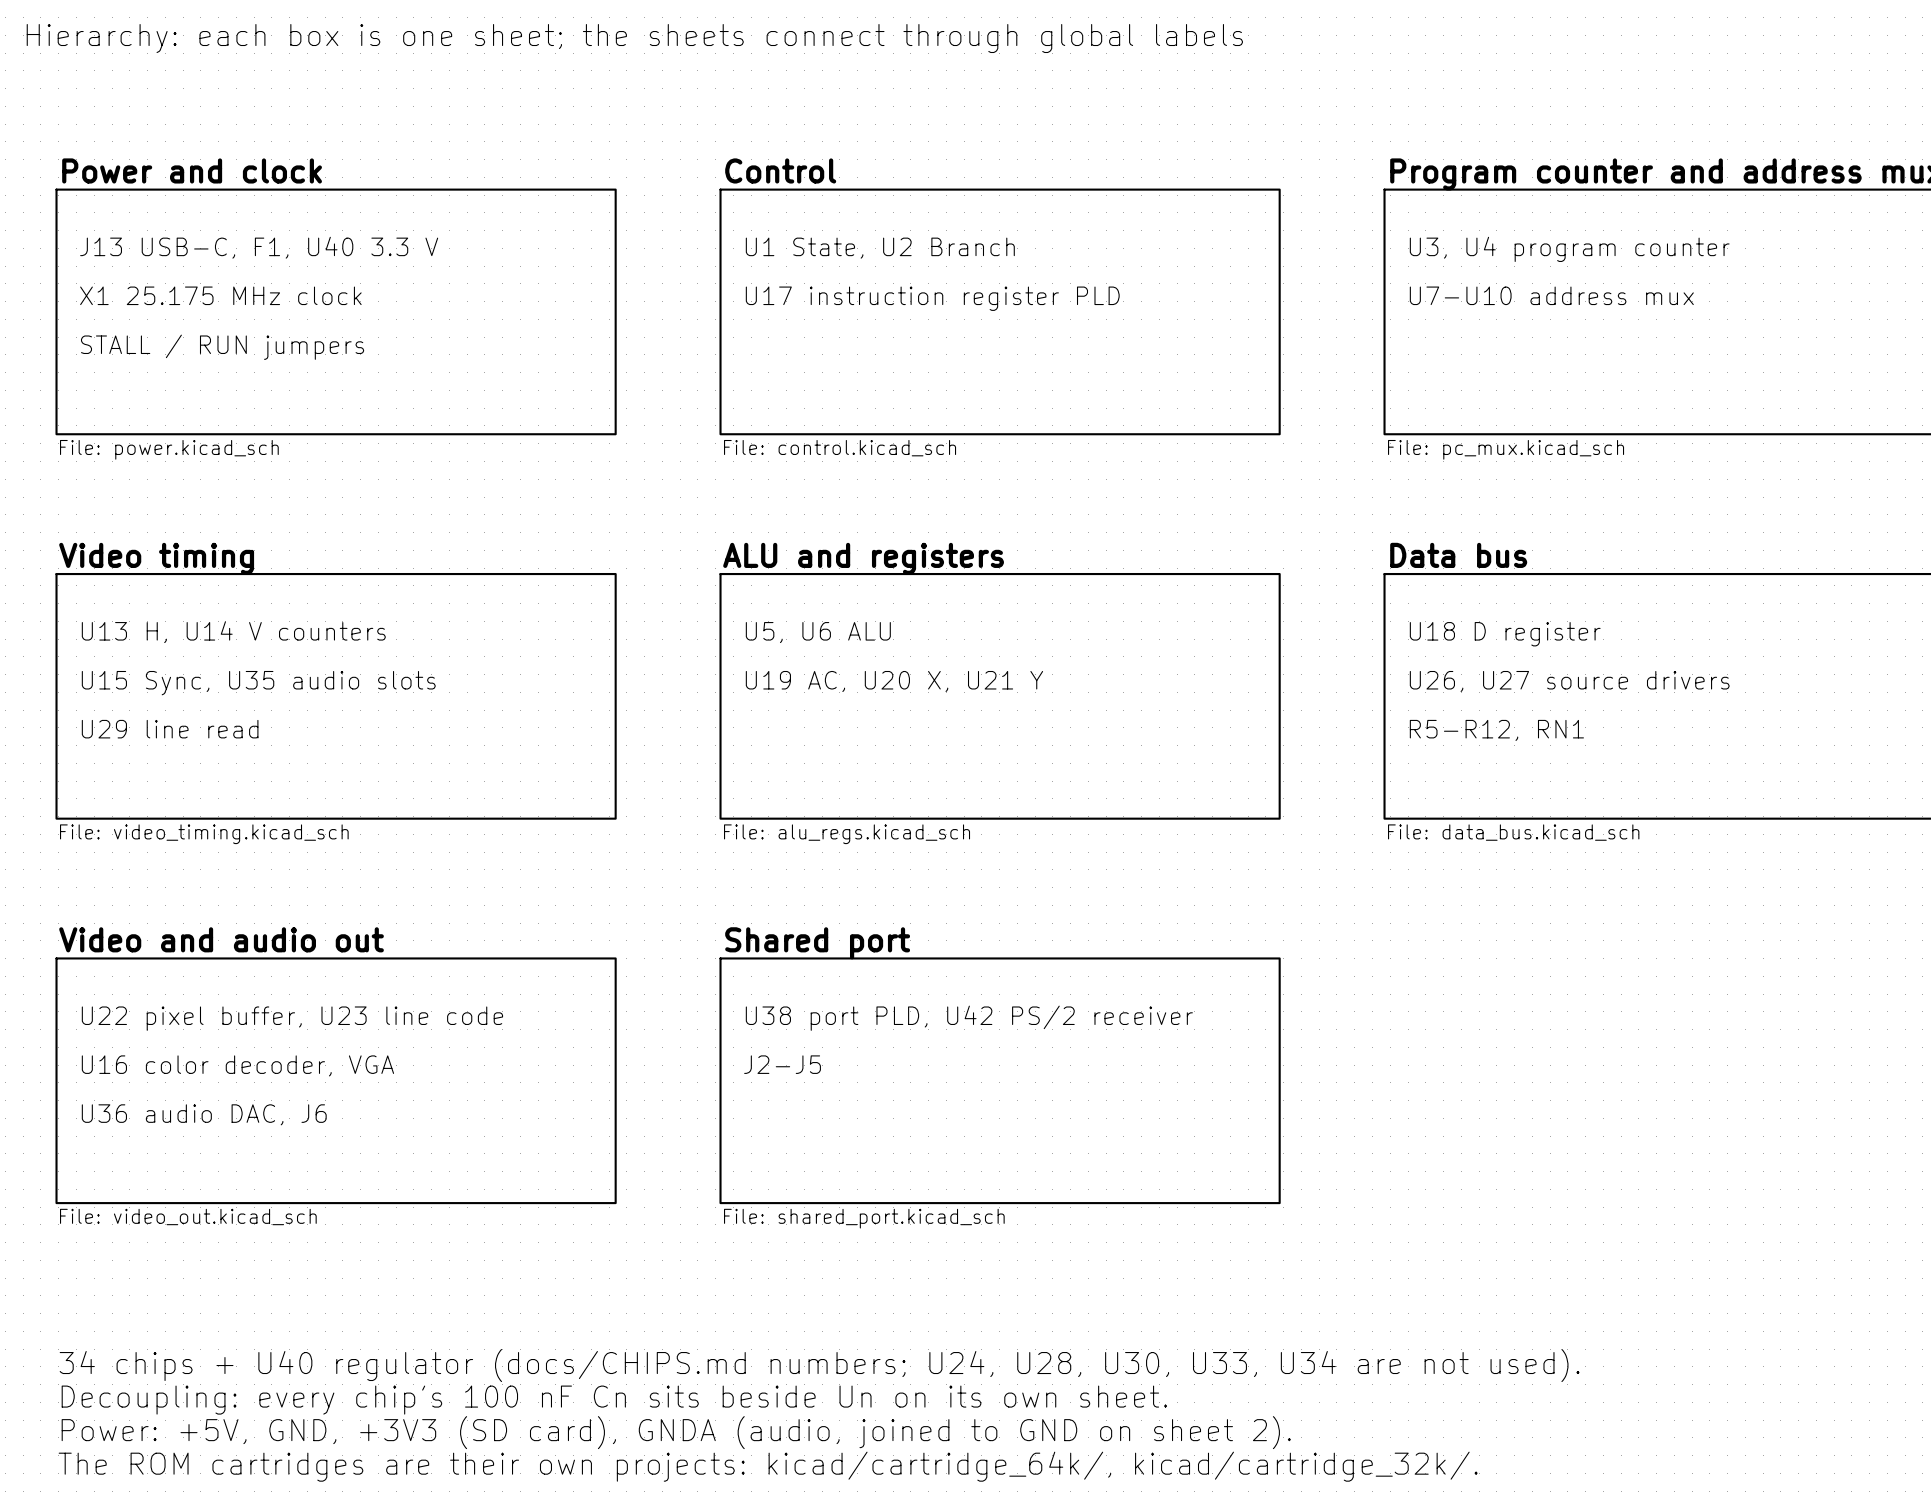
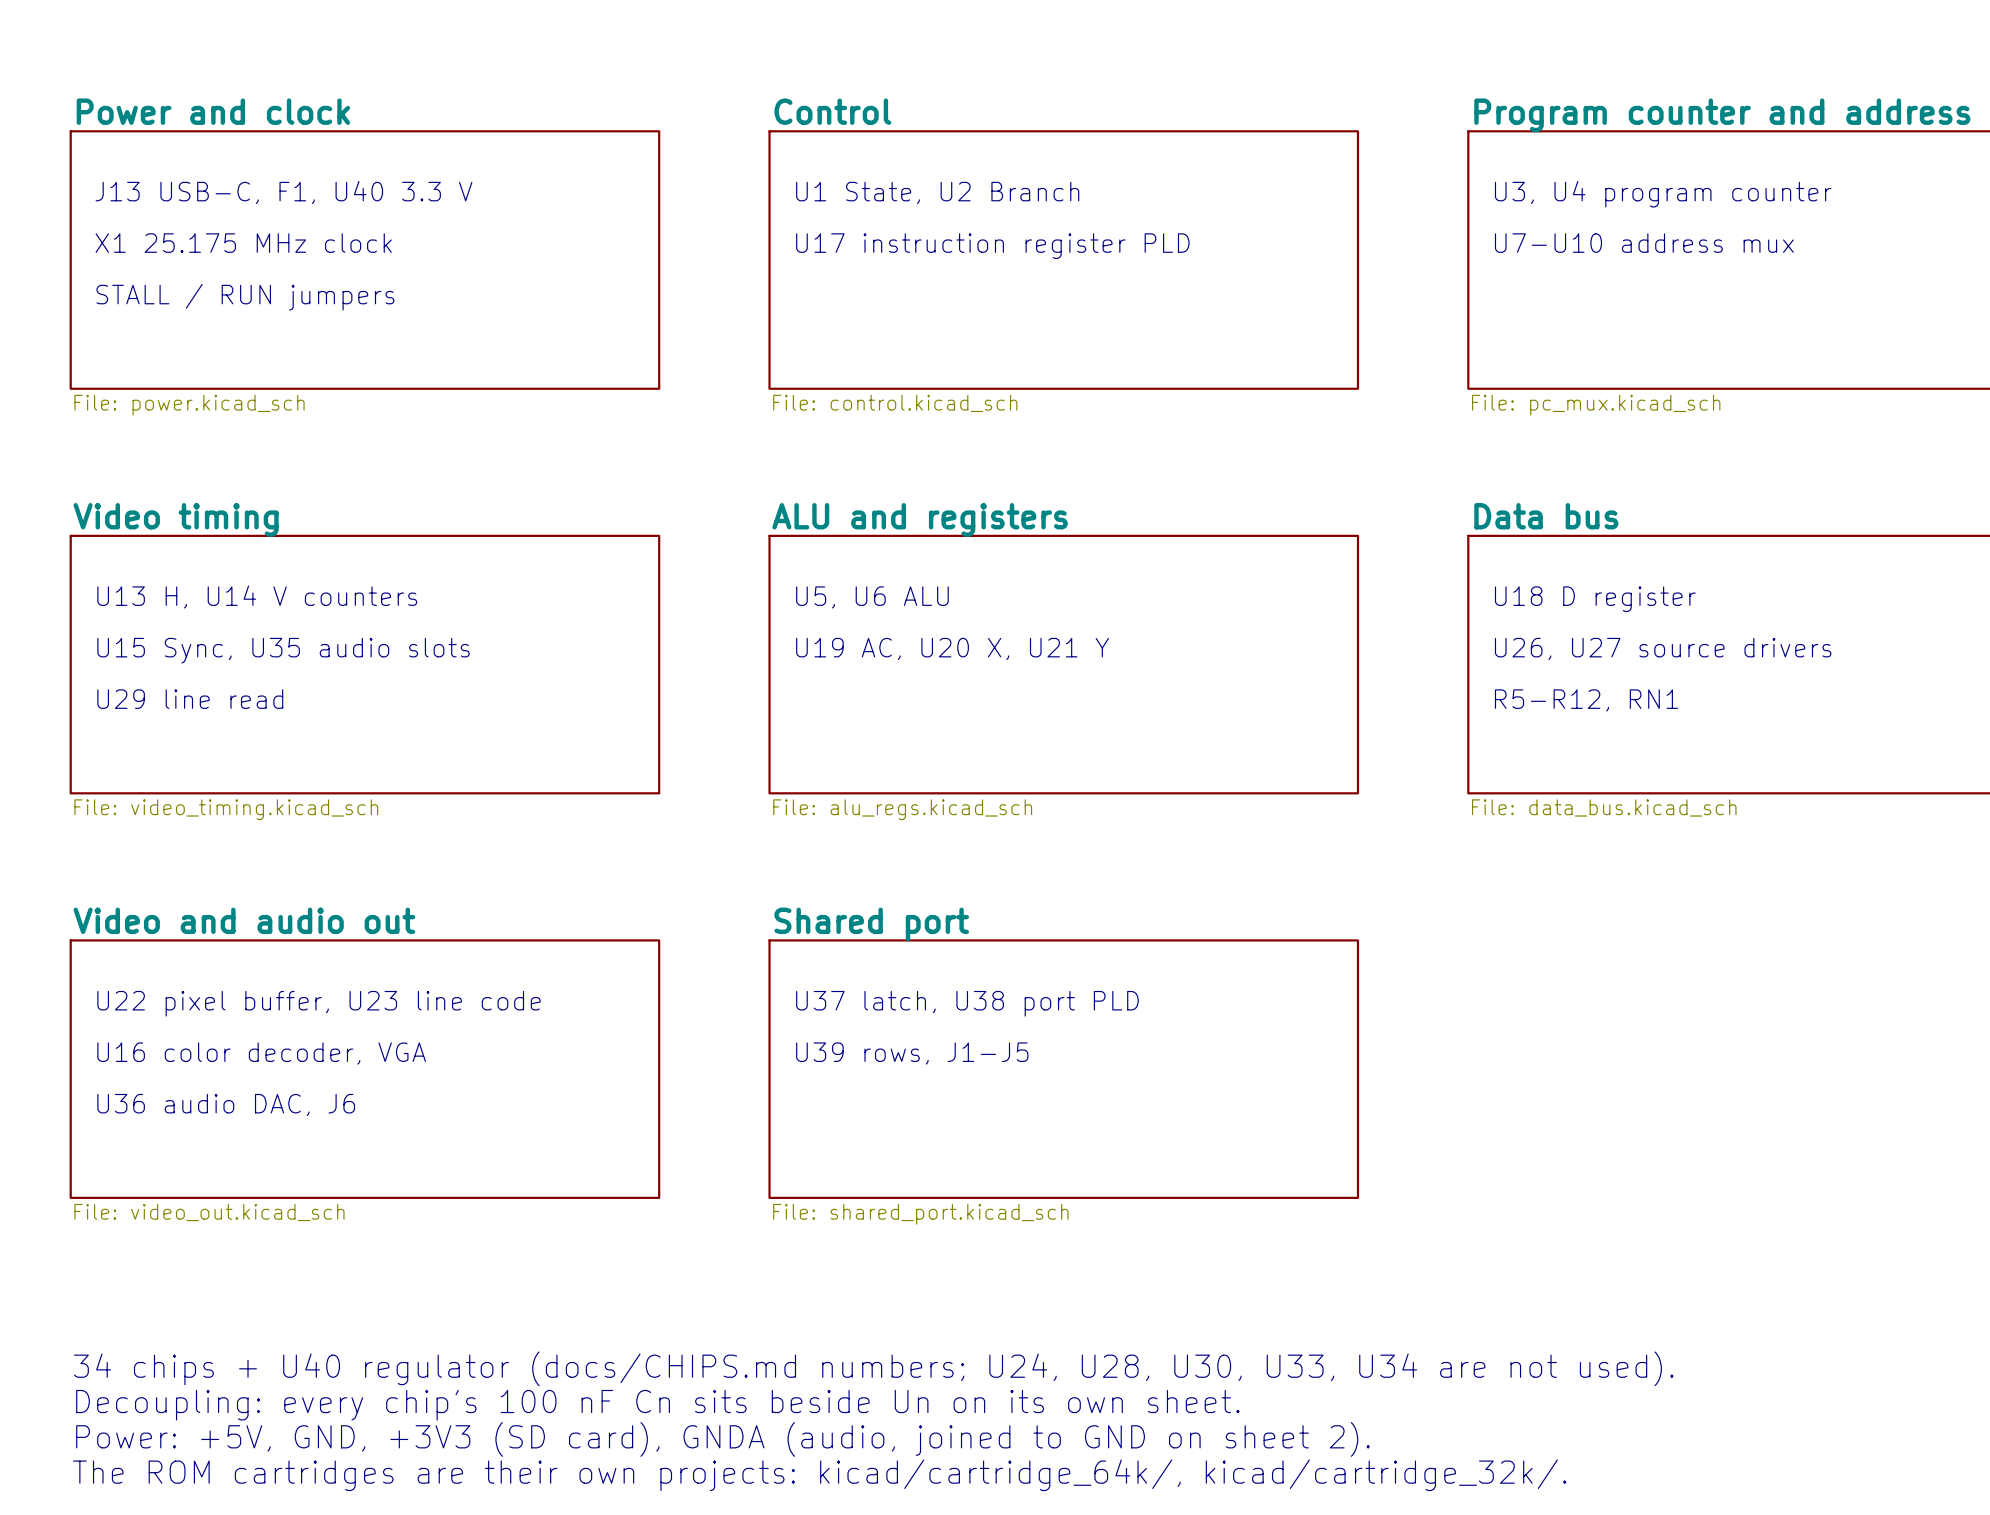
text: U38 port PLD, U42 PS/2 receiver (969, 1018) -> U37 latch, U38 port PLD (967, 1003)
text: J2-J5 (782, 1064) -> U39 rows, J1-J5 (912, 1053)

